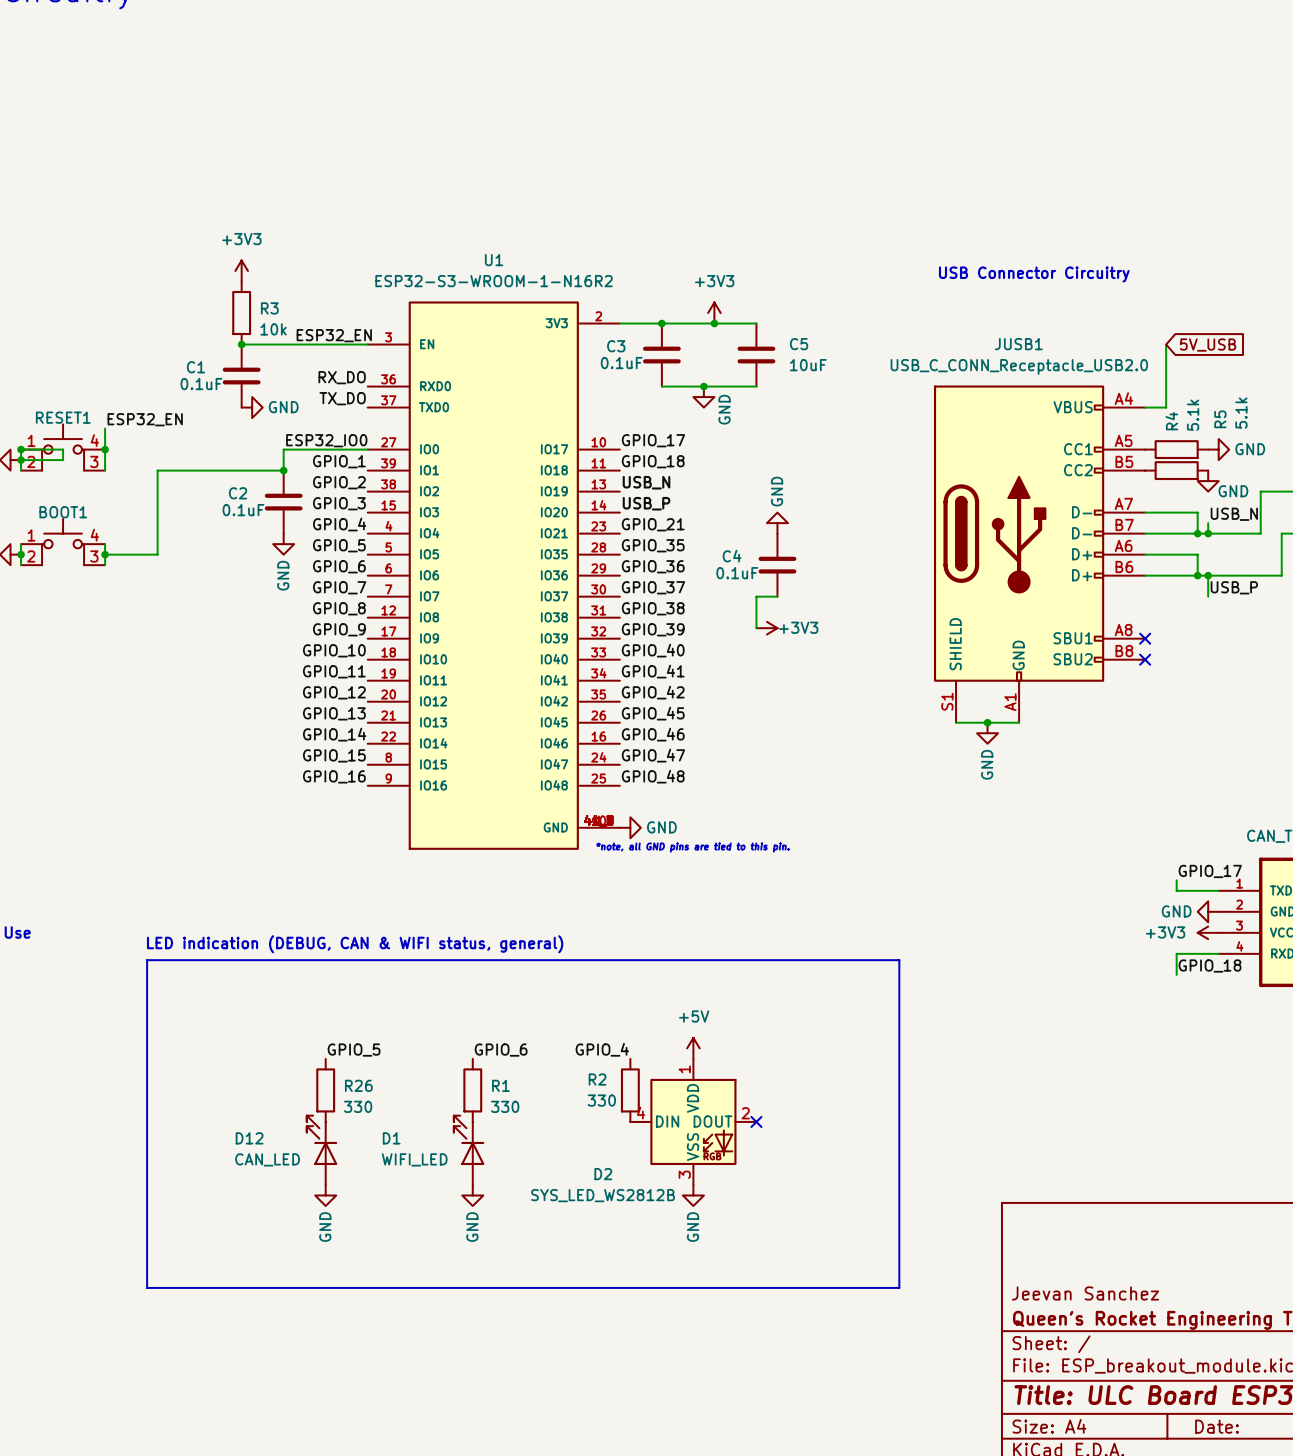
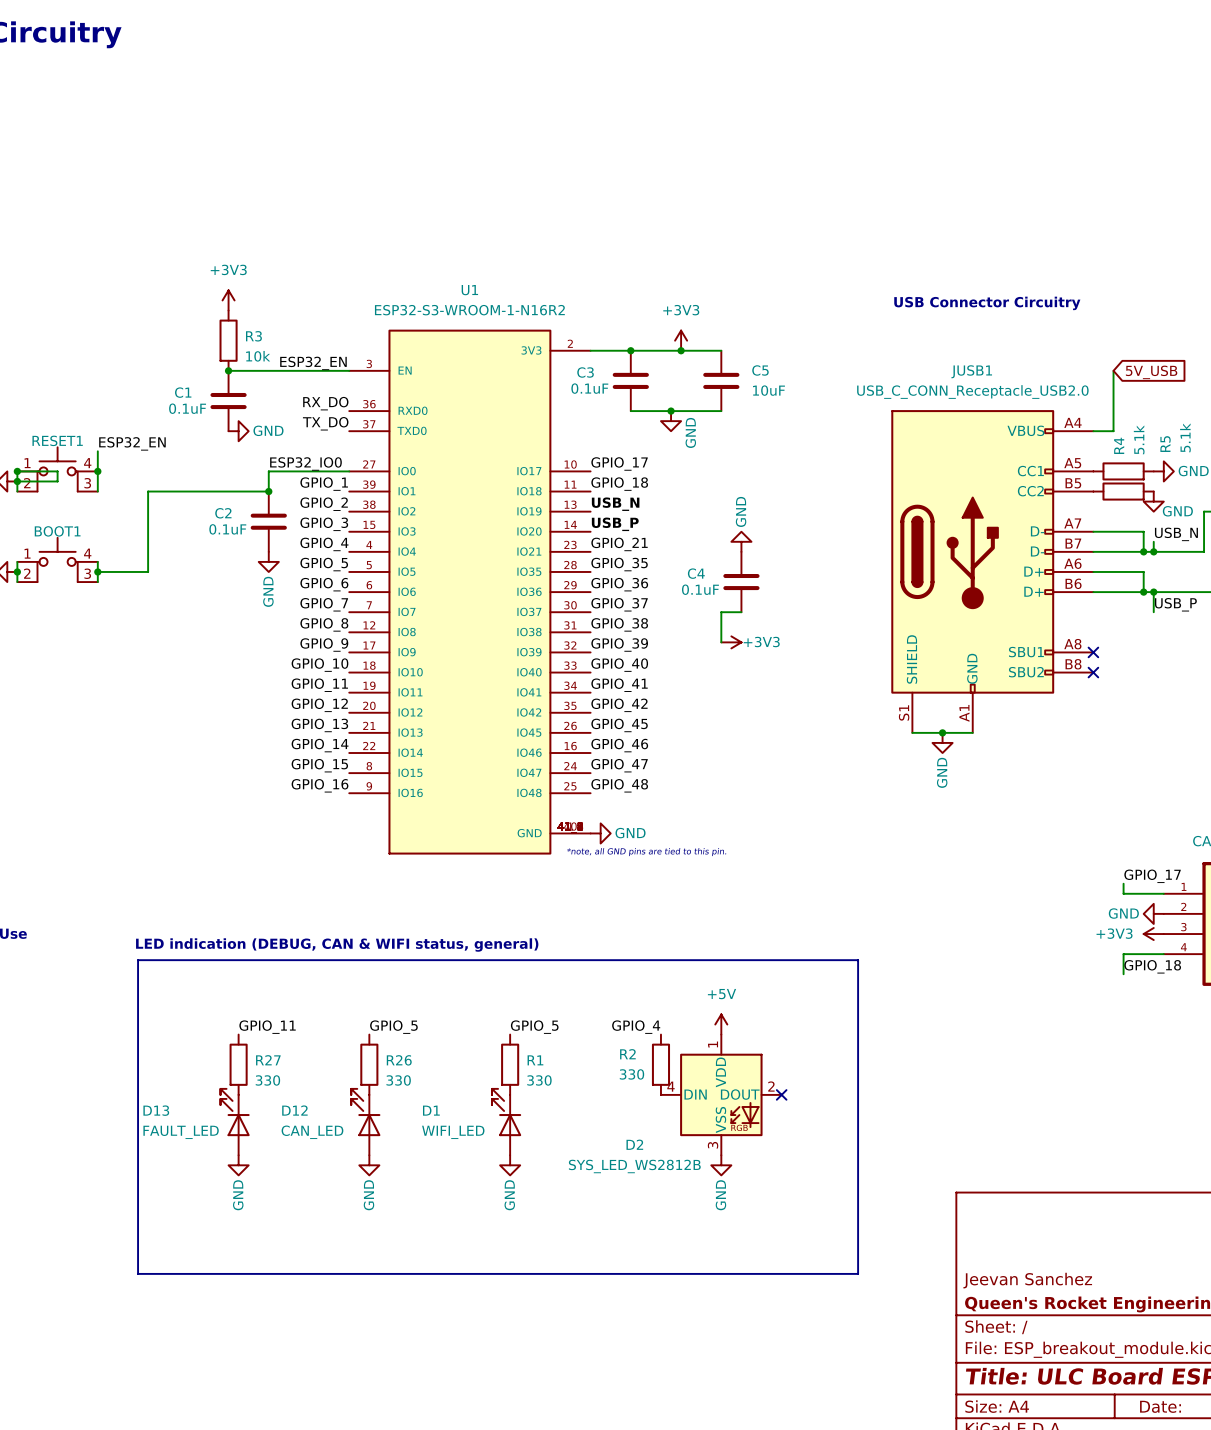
label: none -> GPIO_11 (267, 1027)
power symbol position: +5V (693, 1048) -> +5V (721, 1024)
label position: GPIO_4 (602, 1049) -> GPIO_4 (636, 1027)
label position: GPIO_5 (354, 1050) -> GPIO_5 (393, 1027)
label: GPIO_6 (501, 1050) -> GPIO_5 (534, 1027)
R27: none -> 330 (238, 1064)
R26 position: (325, 1090) -> (369, 1064)
R1 position: (472, 1090) -> (510, 1064)
R2 position: (630, 1090) -> (660, 1064)
no-connect mark: none -> (781, 1094)
D2 position: (693, 1121) -> (721, 1094)
no-connect mark: (756, 1121) -> none
D13: none -> FAULT_LED (235, 1122)
D12 position: (322, 1150) -> (365, 1122)
D1 position: (469, 1150) -> (506, 1122)
power symbol: none -> GND (238, 1165)
power symbol: none -> GND (369, 1165)
power symbol: none -> GND (510, 1165)
power symbol: GND (325, 1195) -> none
power symbol: GND (472, 1195) -> none
power symbol position: GND (693, 1195) -> GND (721, 1165)

